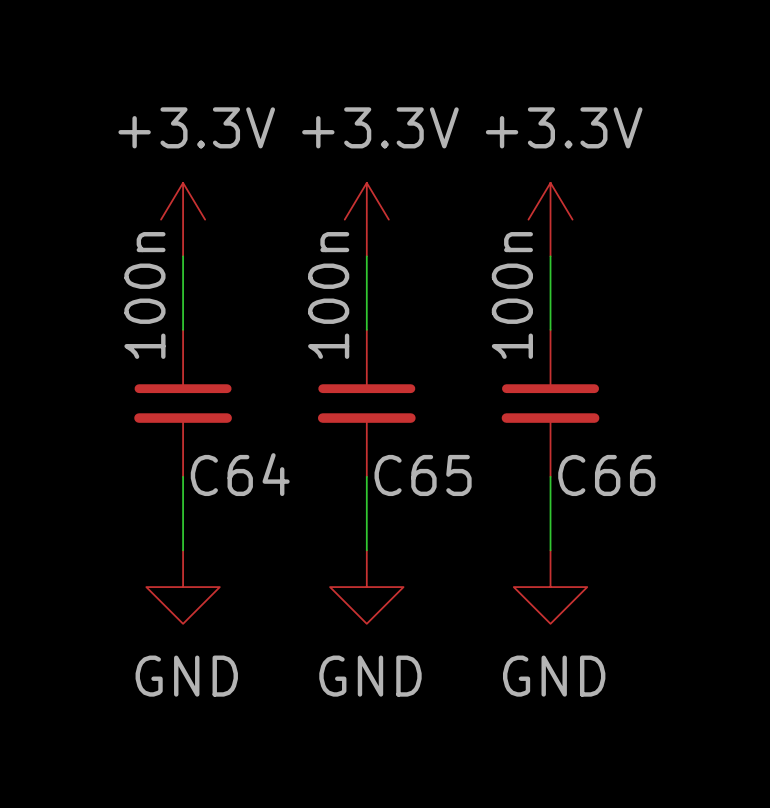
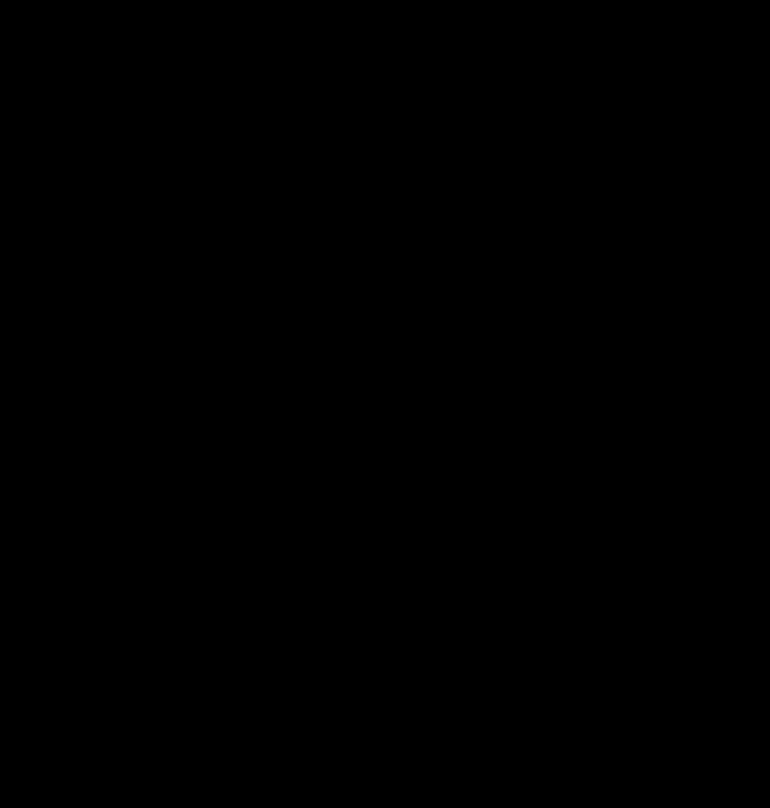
power symbol: +3.3V (183, 219) -> none
power symbol: +3.3V (366, 219) -> none
power symbol: +3.3V (550, 219) -> none
wire: (183, 256) (183, 329) -> none
wire: (366, 256) (366, 329) -> none
wire: (550, 256) (550, 329) -> none
C64: 100n (183, 403) -> none
C65: 100n (366, 403) -> none
C66: 100n (550, 403) -> none
wire: (183, 476) (183, 550) -> none
wire: (366, 476) (366, 550) -> none
wire: (550, 476) (550, 550) -> none
power symbol: GND (183, 587) -> none
power symbol: GND (366, 587) -> none
power symbol: GND (550, 587) -> none

